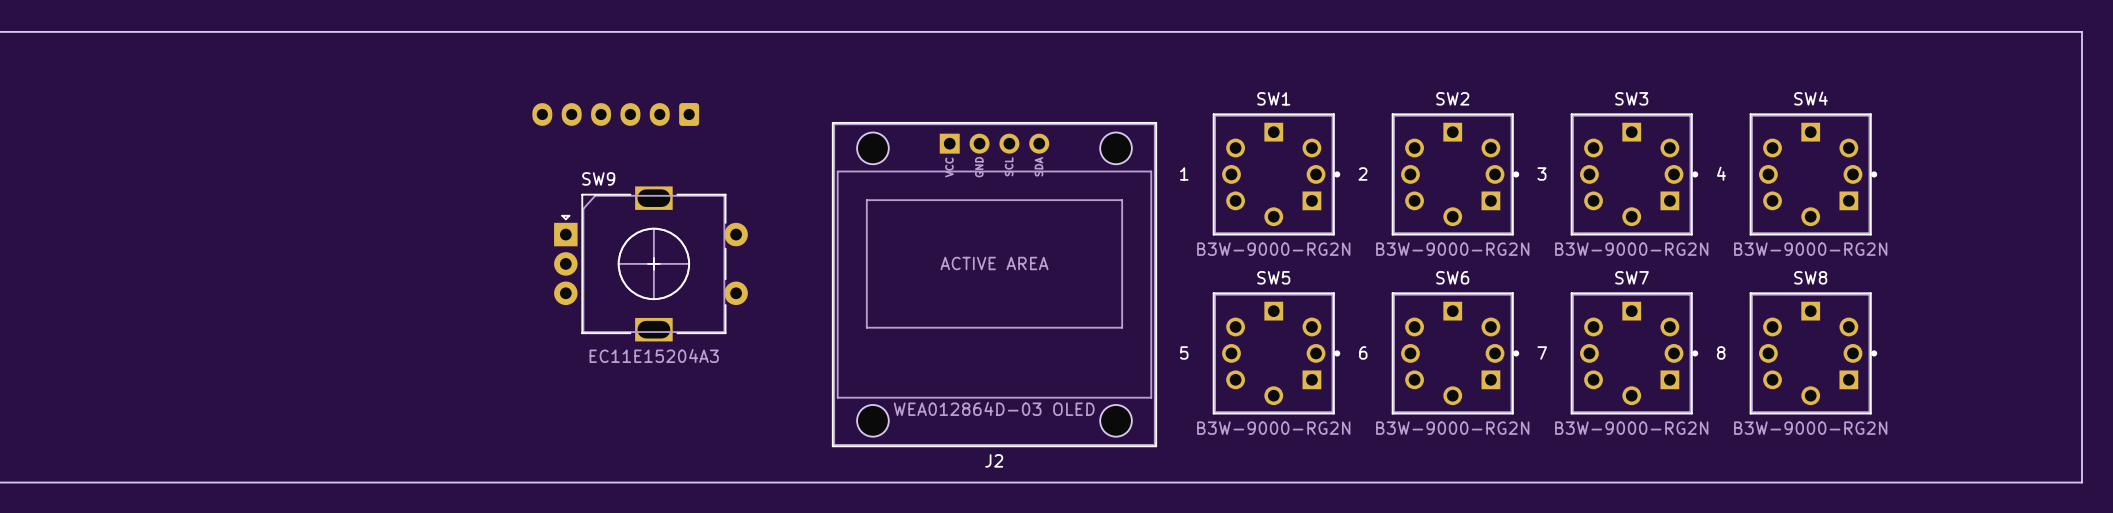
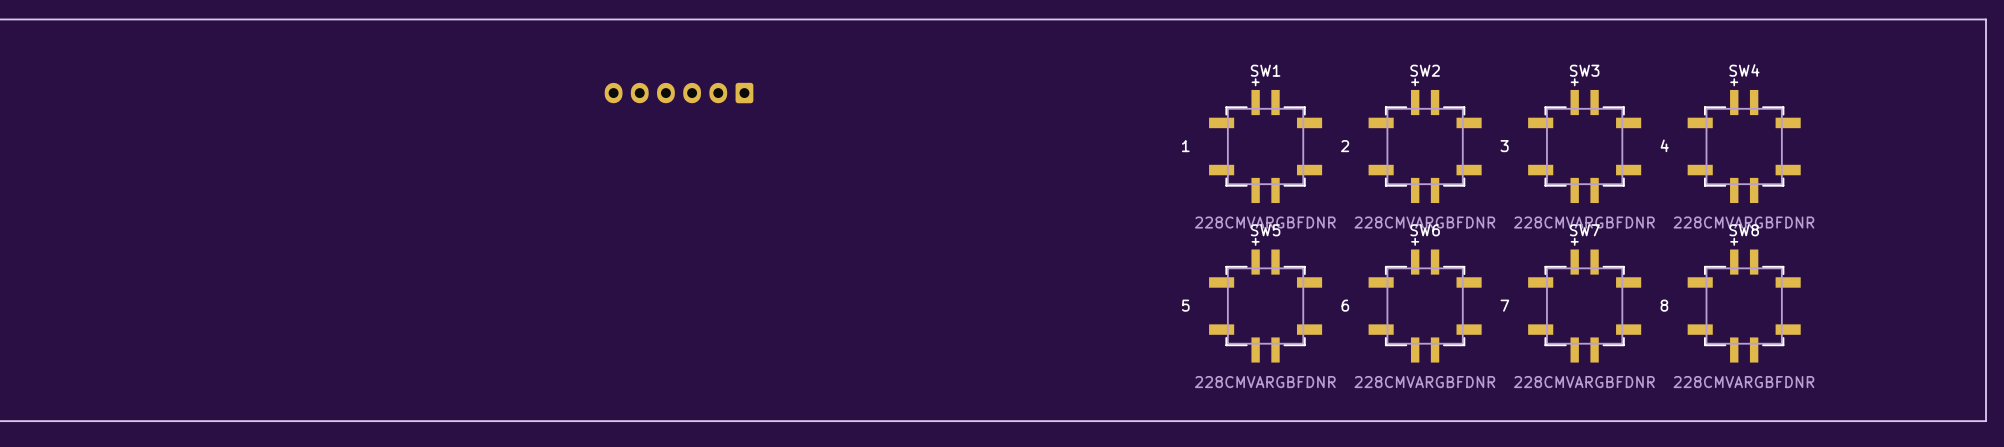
SW1 footprint: [1212, 113, 1341, 236] -> [1209, 89, 1323, 204]
SW2 footprint: [1391, 113, 1520, 236] -> [1368, 89, 1482, 204]
SW3 footprint: [1570, 113, 1699, 236] -> [1528, 89, 1642, 204]
SW4 footprint: [1749, 113, 1878, 236] -> [1687, 89, 1801, 204]
SW1 value: B3W-9000-RG2N (1273, 249) -> 228CMVARGBFDNR (1265, 222)
SW2 value: B3W-9000-RG2N (1452, 249) -> 228CMVARGBFDNR (1424, 222)
SW3 value: B3W-9000-RG2N (1631, 249) -> 228CMVARGBFDNR (1584, 222)
SW4 value: B3W-9000-RG2N (1810, 249) -> 228CMVARGBFDNR (1743, 222)
SW9: EC11E15204A3 (650, 263) -> none
J2: WEA012864D-03 OLED (994, 284) -> none
SW5 footprint: [1212, 292, 1341, 415] -> [1209, 249, 1323, 363]
SW6 footprint: [1391, 292, 1520, 415] -> [1368, 249, 1482, 363]
SW7 footprint: [1570, 292, 1699, 415] -> [1528, 249, 1642, 363]
SW8 footprint: [1749, 292, 1878, 415] -> [1687, 249, 1801, 363]
SW5 value: B3W-9000-RG2N (1273, 428) -> 228CMVARGBFDNR (1265, 382)
SW6 value: B3W-9000-RG2N (1452, 428) -> 228CMVARGBFDNR (1424, 382)
SW7 value: B3W-9000-RG2N (1631, 428) -> 228CMVARGBFDNR (1584, 382)
SW8 value: B3W-9000-RG2N (1810, 428) -> 228CMVARGBFDNR (1743, 382)

